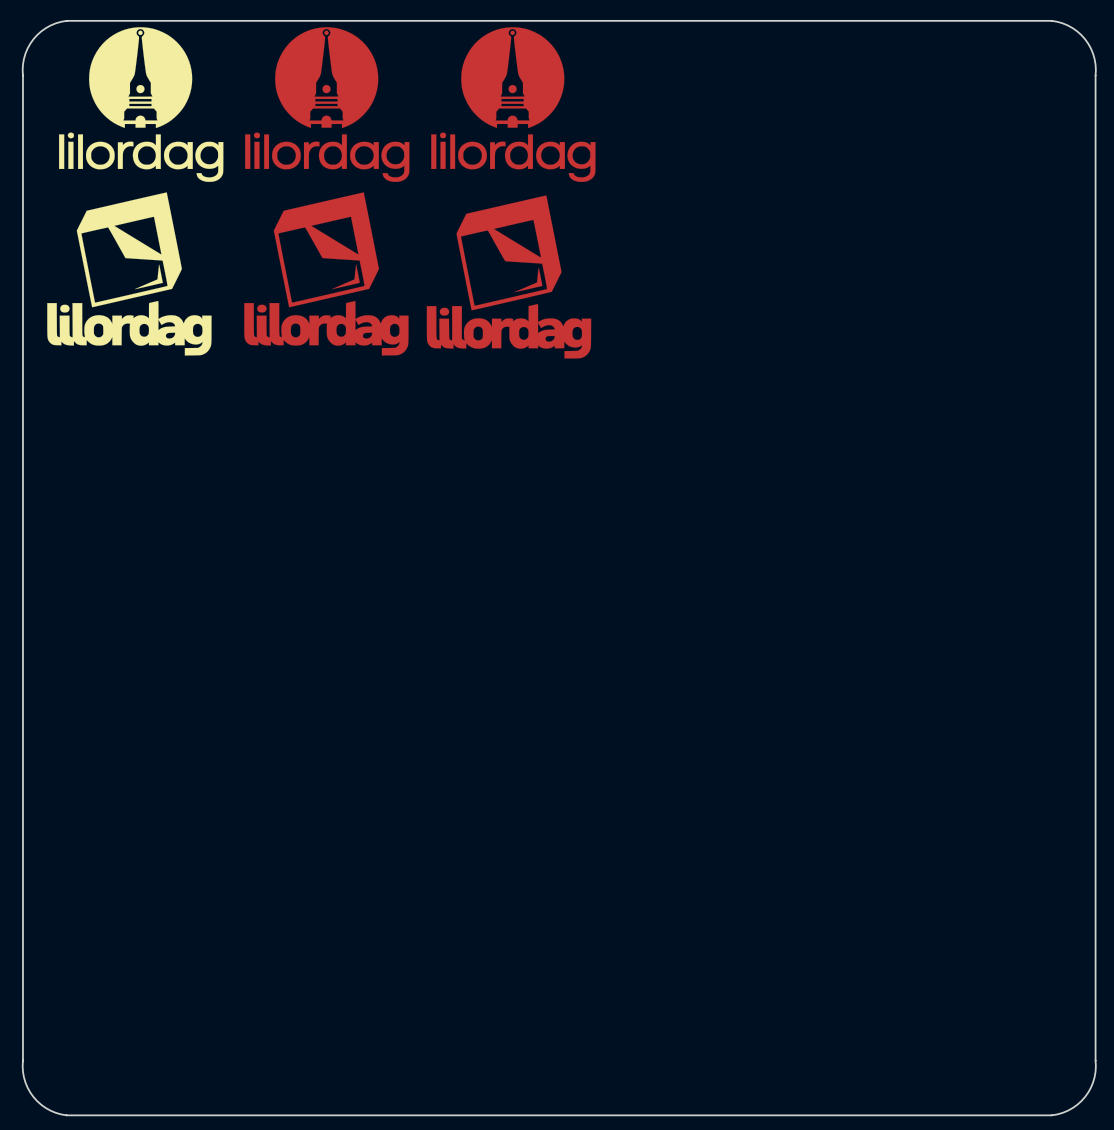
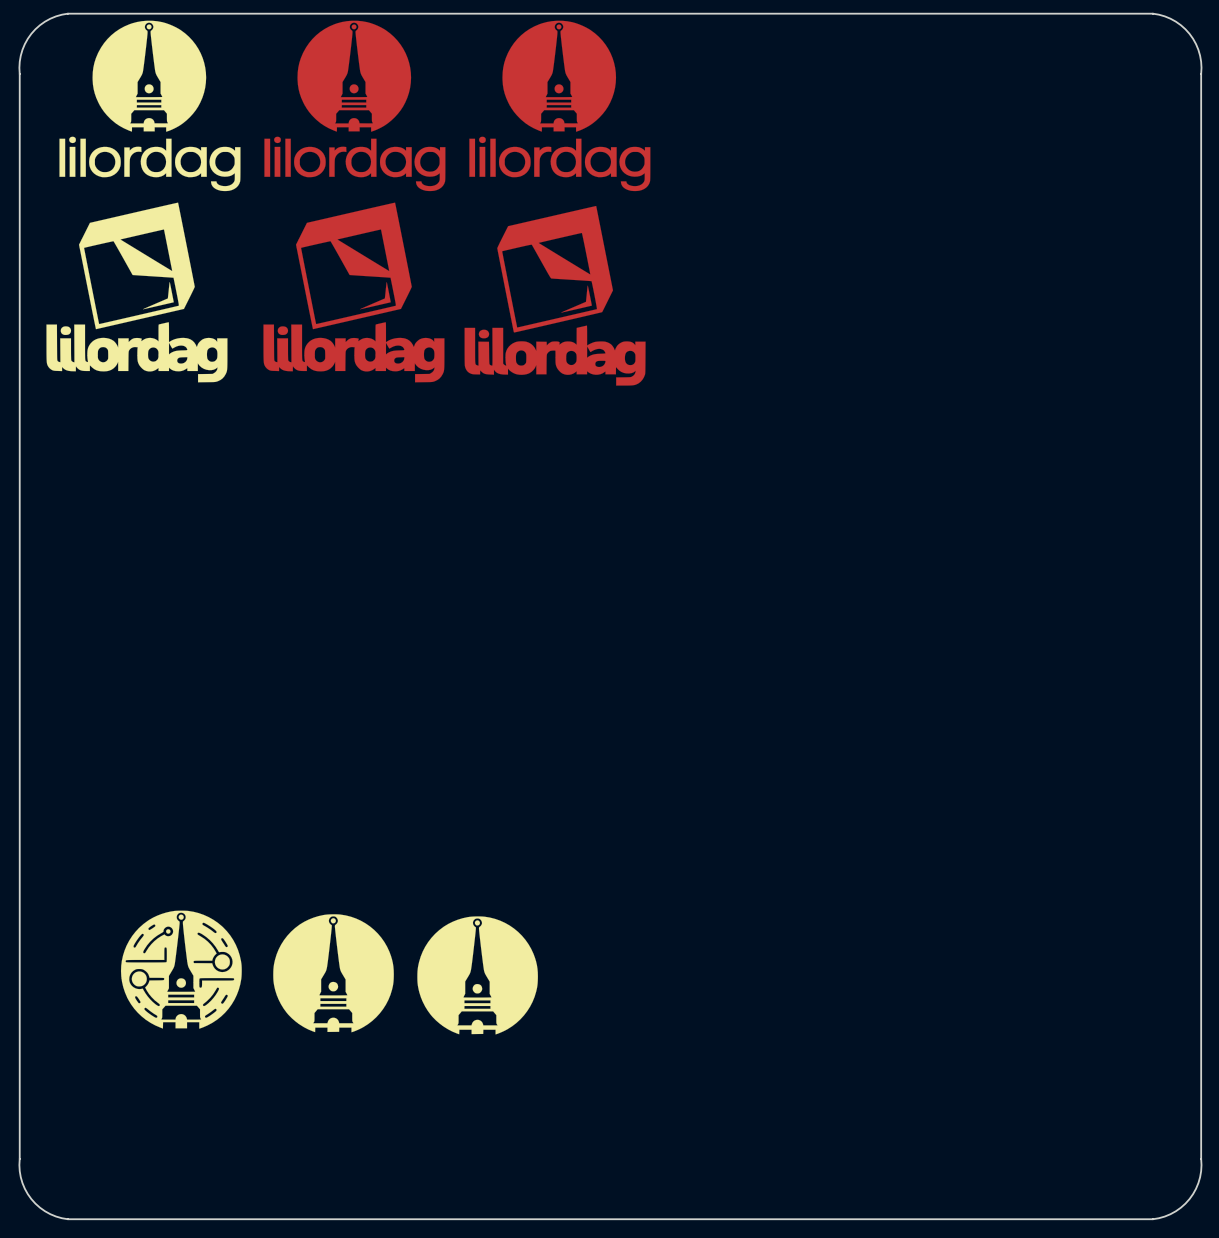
drawing: none -> [120, 910, 242, 1029]
drawing: none -> [273, 914, 394, 1033]
drawing: none -> [417, 916, 538, 1035]

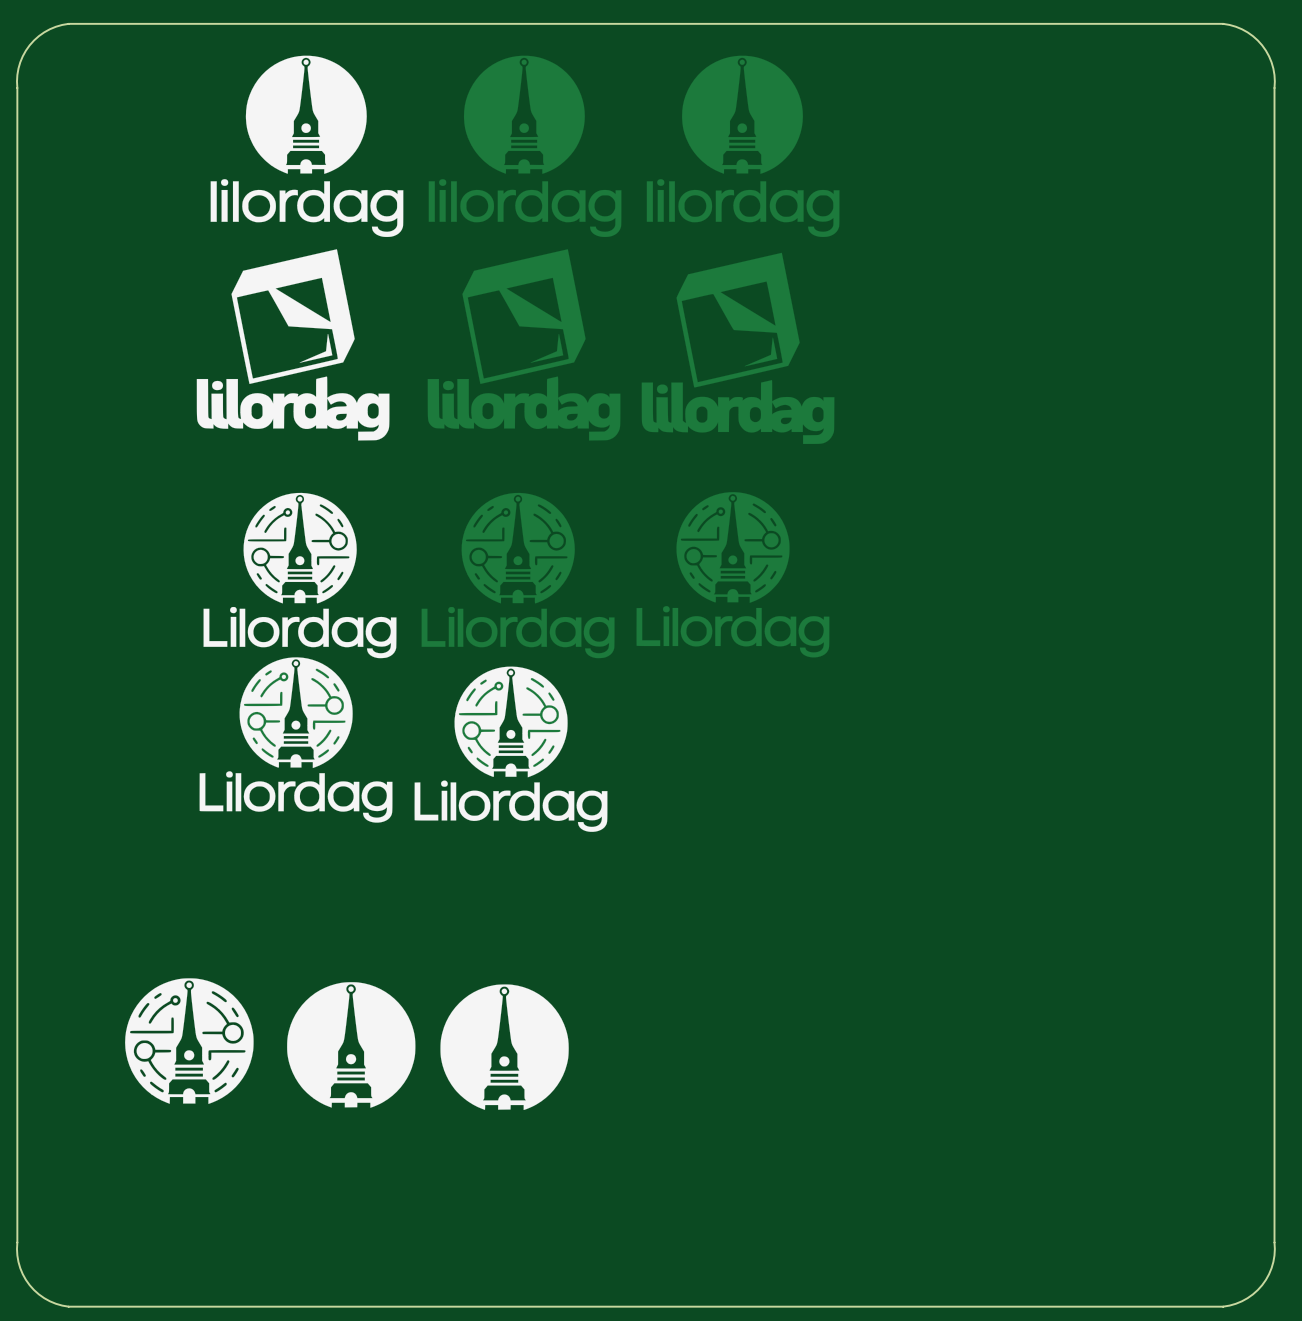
drawing: [264, 20, 446, 192] -> none
drawing: none -> [646, 55, 840, 238]
drawing position: (149, 105) -> (307, 146)
drawing position: (559, 105) -> (525, 146)
drawing position: (136, 292) -> (293, 344)
drawing position: (353, 292) -> (524, 344)
drawing position: (555, 295) -> (738, 348)
drawing: none -> [636, 492, 830, 658]
drawing: none -> [199, 492, 397, 823]
drawing: none -> [414, 492, 615, 832]

